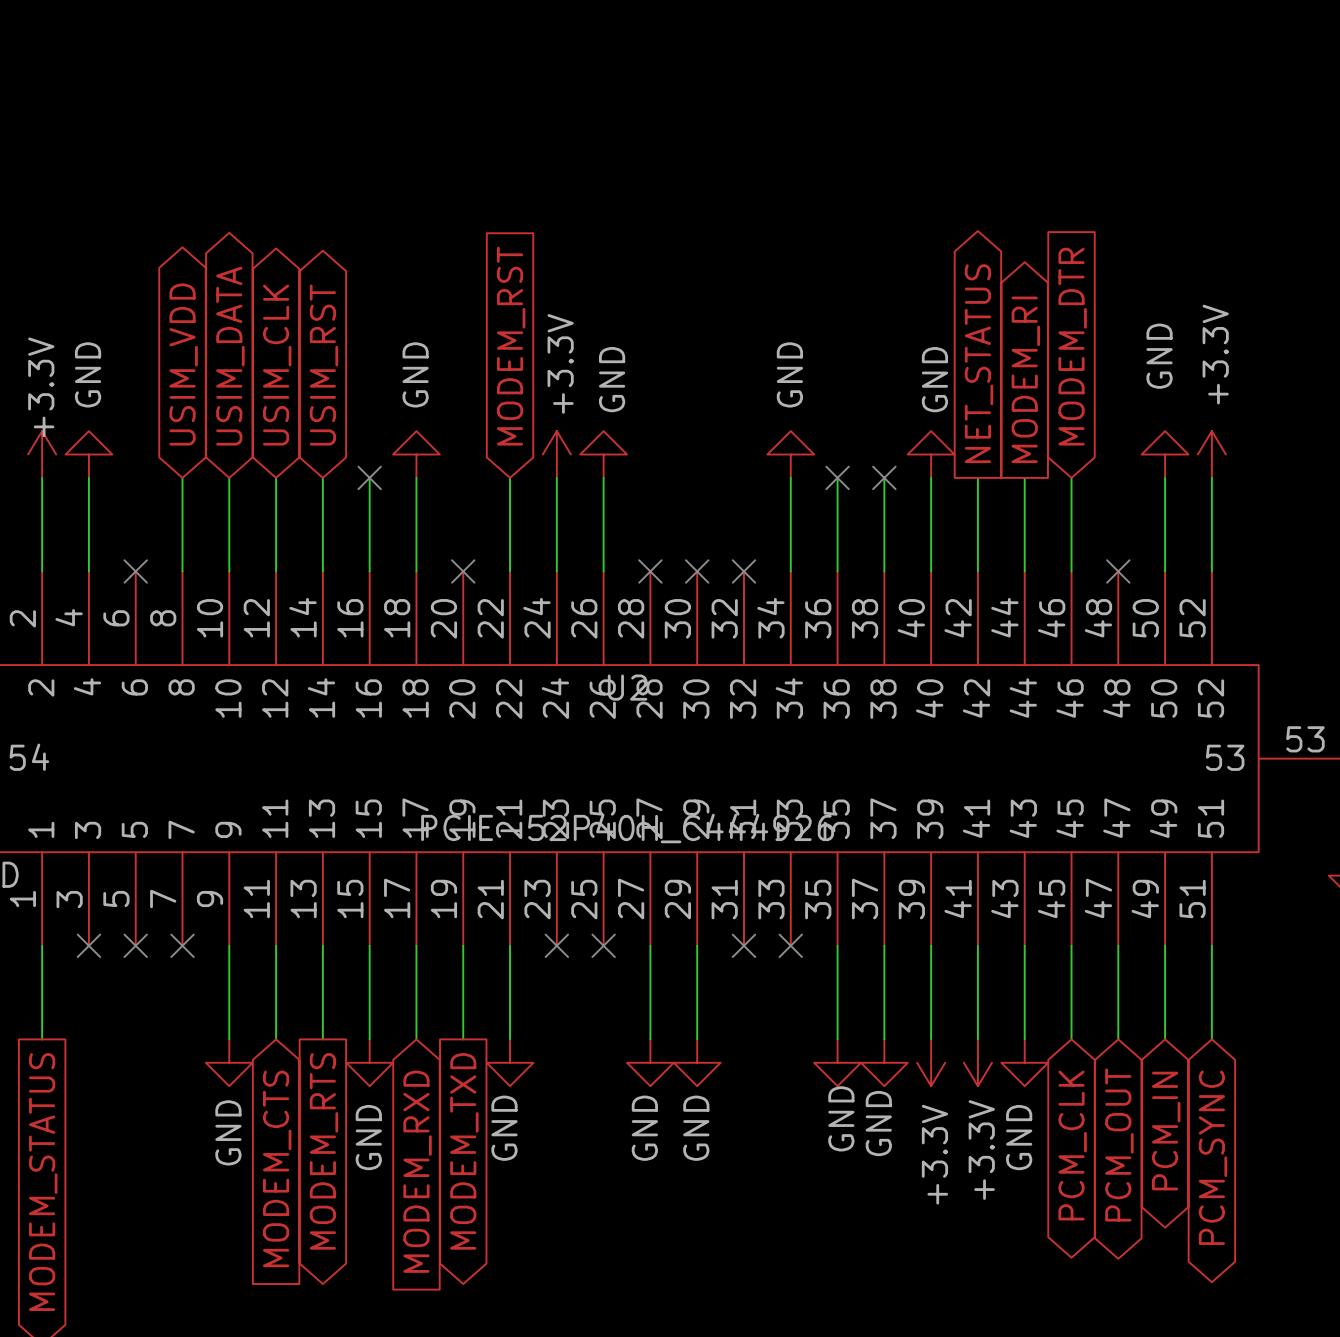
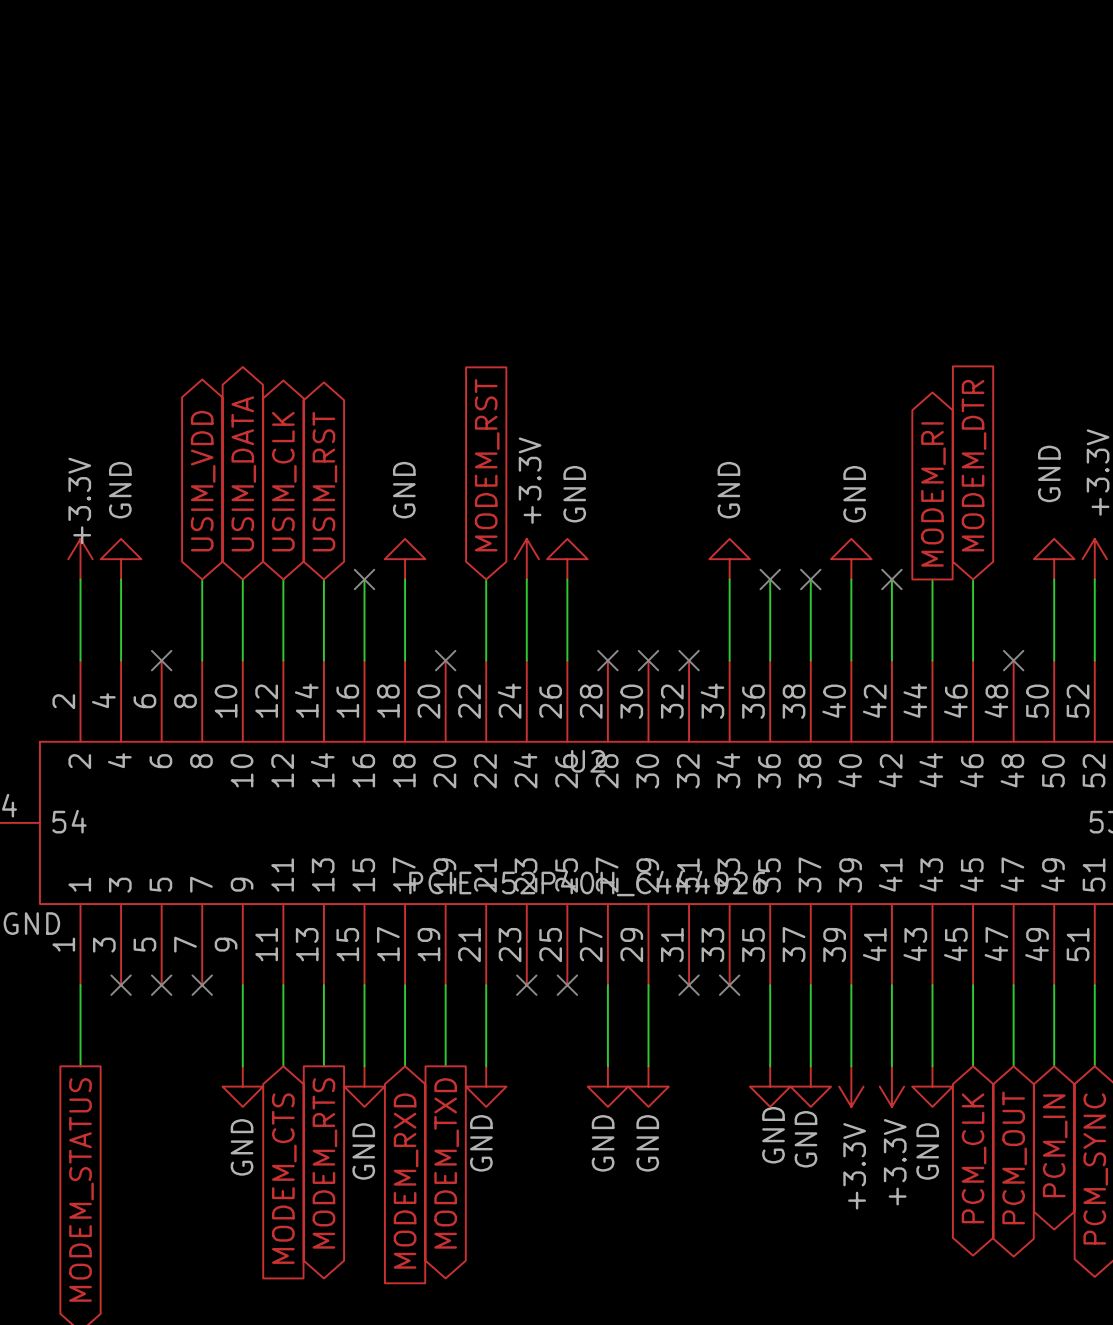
global label: NET_STATUS (979, 363) -> none
no-connect mark: none -> (891, 579)

